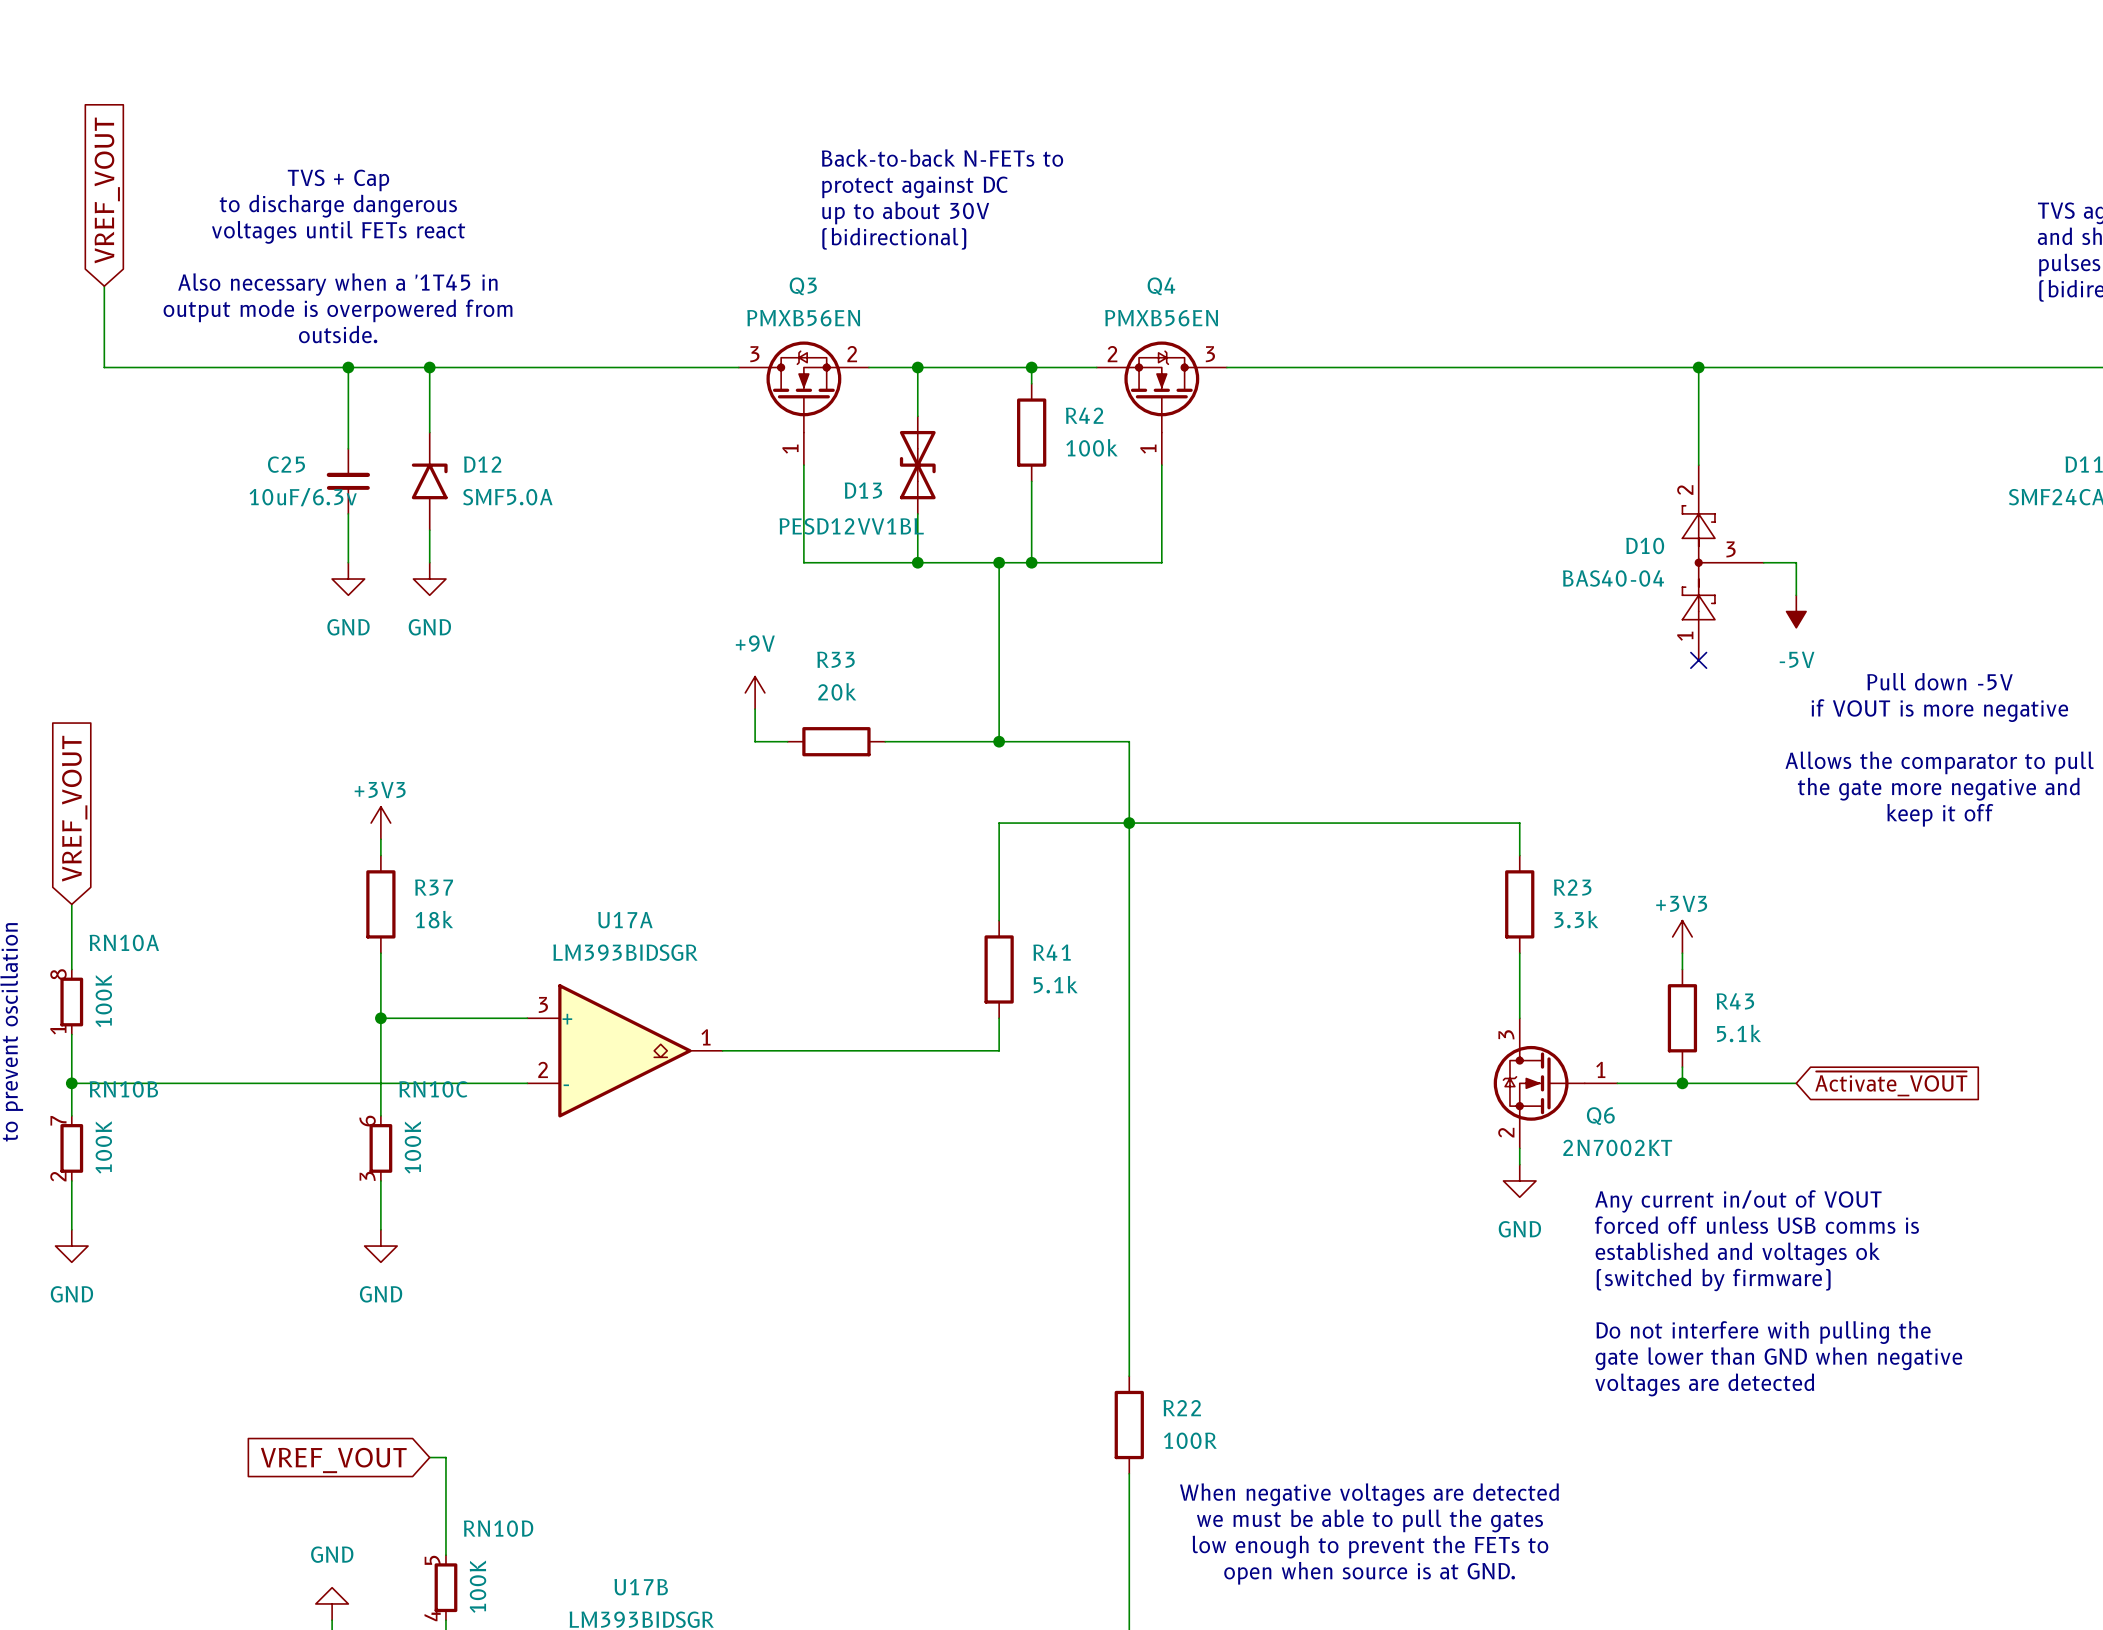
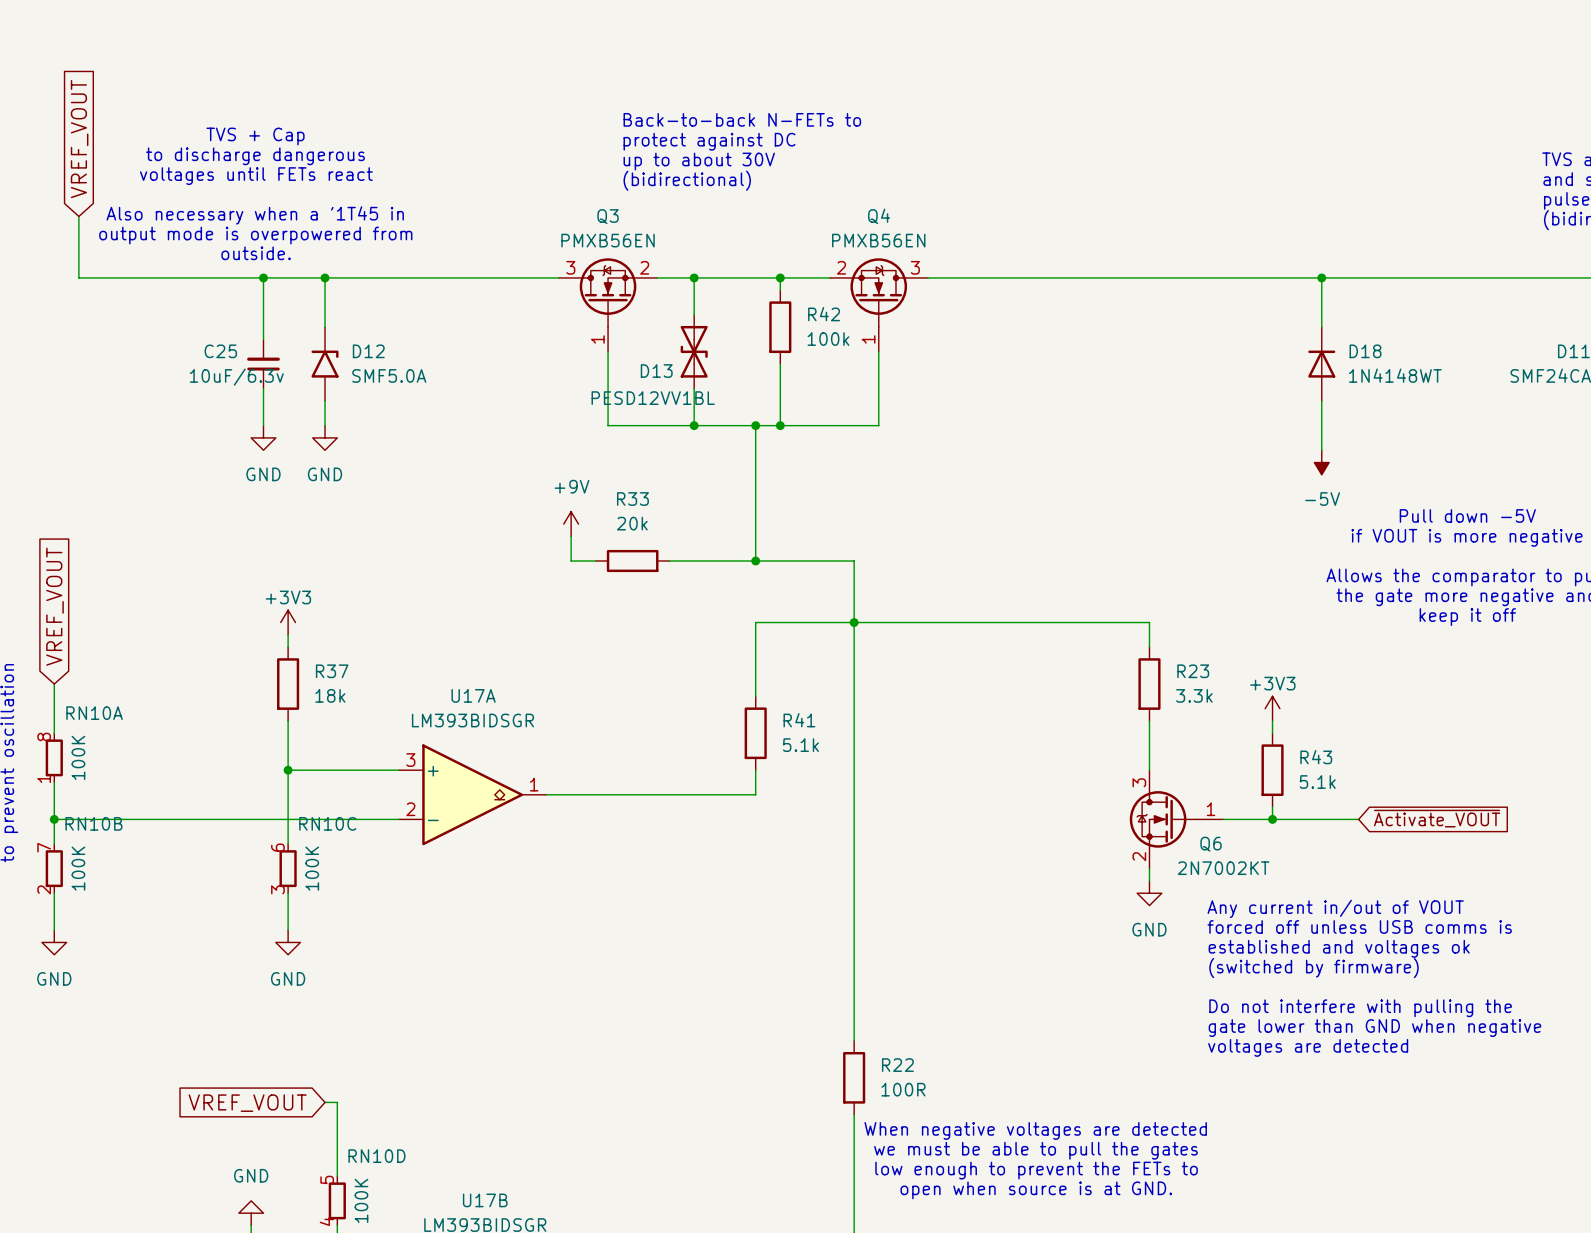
wire: (1698, 367) (1698, 465) -> none
junction position: (1698, 367) -> (1321, 277)
wire: none -> (1321, 277) (1321, 327)
D18: none -> 1N4148WT (1321, 364)
wire: none -> (1321, 401) (1321, 450)
D10: BAS40-04 (1723, 562) -> none
wire: (1763, 562) (1796, 562) (1796, 595) -> none
power symbol position: -5V (1796, 611) -> -5V (1321, 462)
no-connect mark: (1698, 660) -> none

